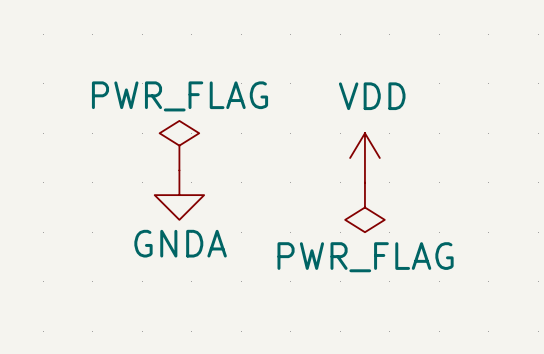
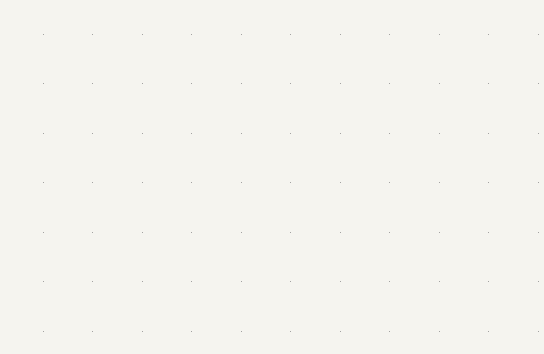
power symbol: PWR_FLAG (179, 145) -> none
power symbol: VDD (364, 158) -> none
power symbol: GNDA (179, 195) -> none
power symbol: PWR_FLAG (364, 207) -> none

